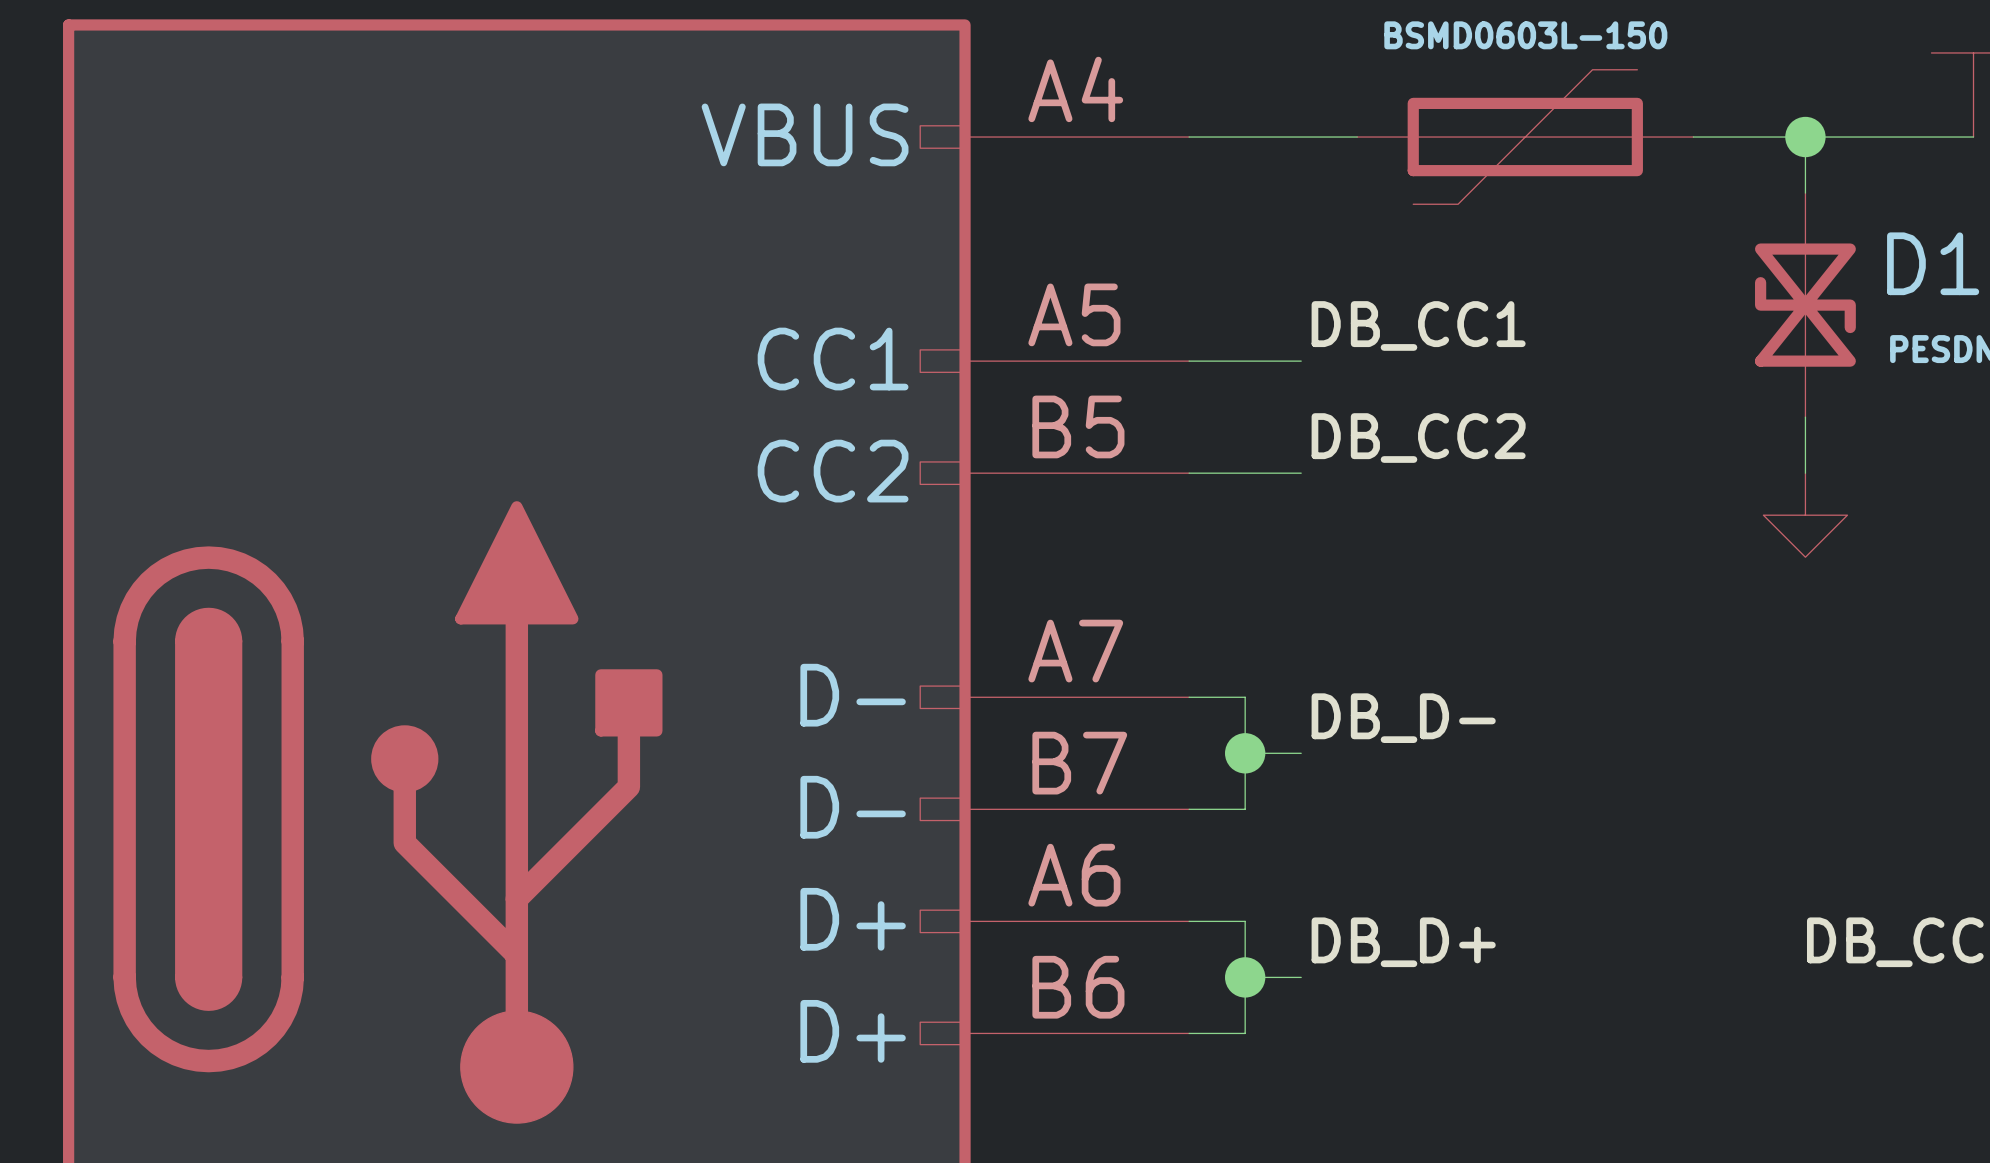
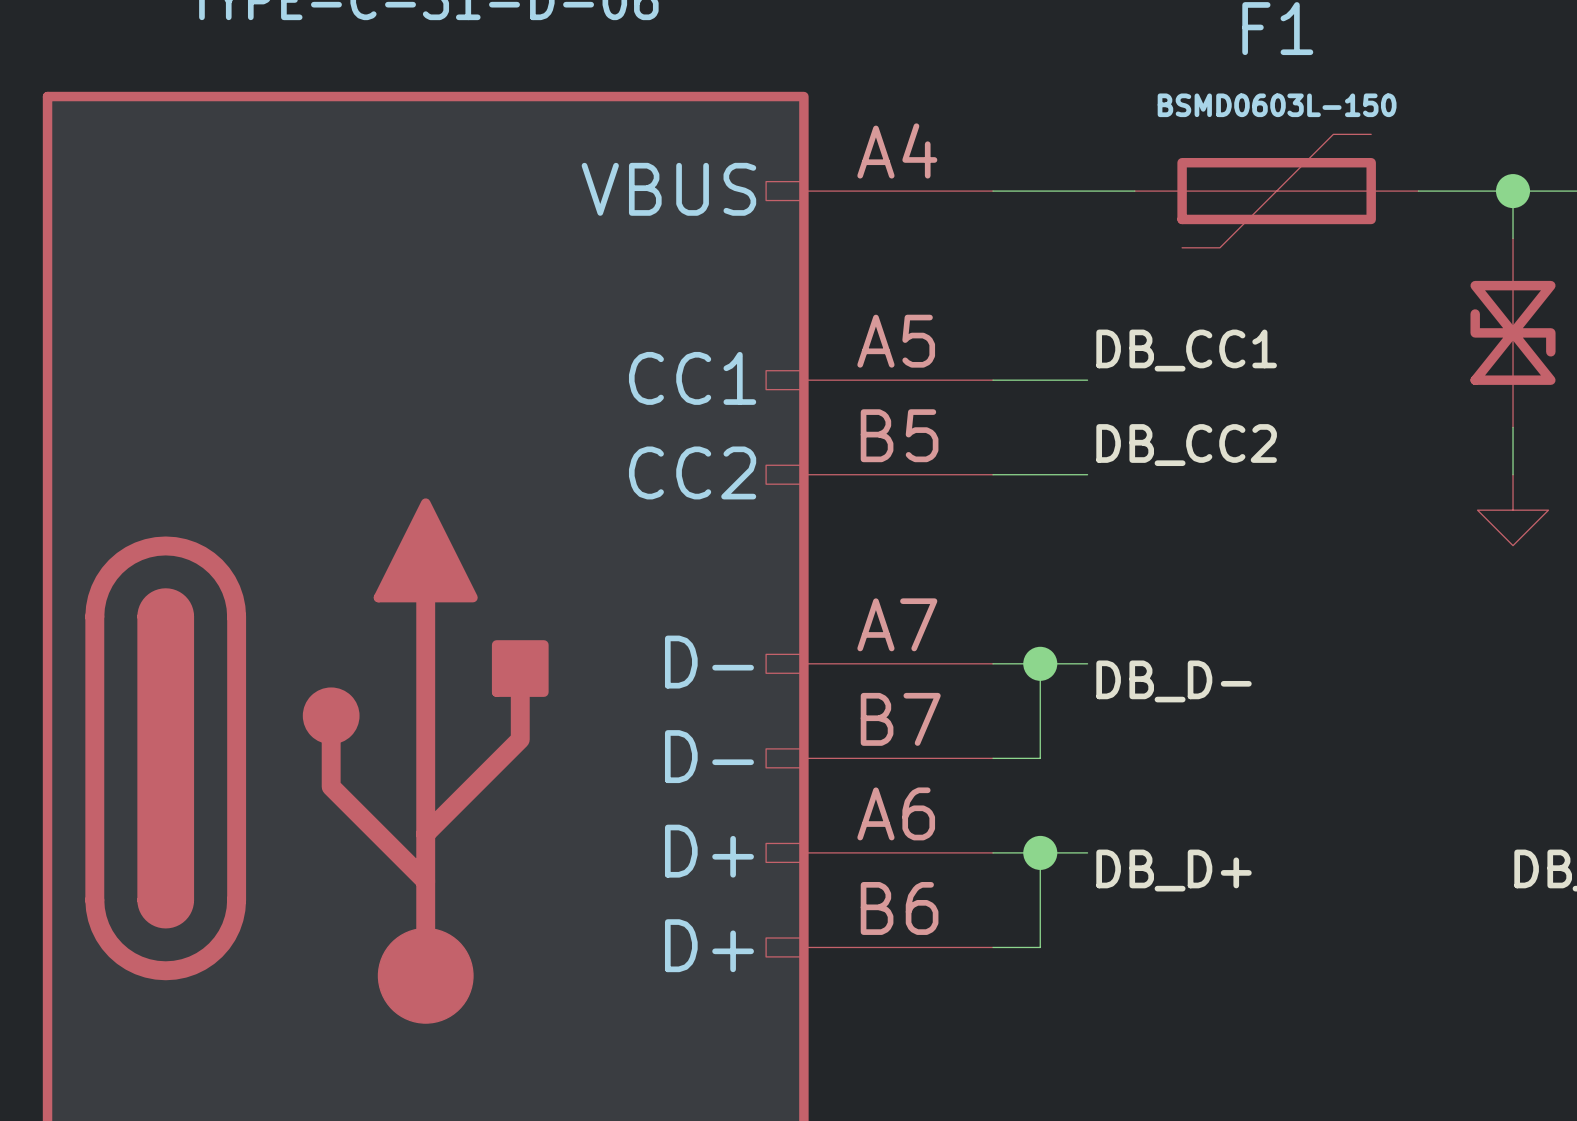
wire: (1245, 753) (1301, 753) -> (1040, 663) (1087, 663)
junction position: (1245, 753) -> (1040, 663)
wire: (1245, 977) (1301, 977) -> (1040, 852) (1087, 852)
junction position: (1245, 977) -> (1040, 852)

